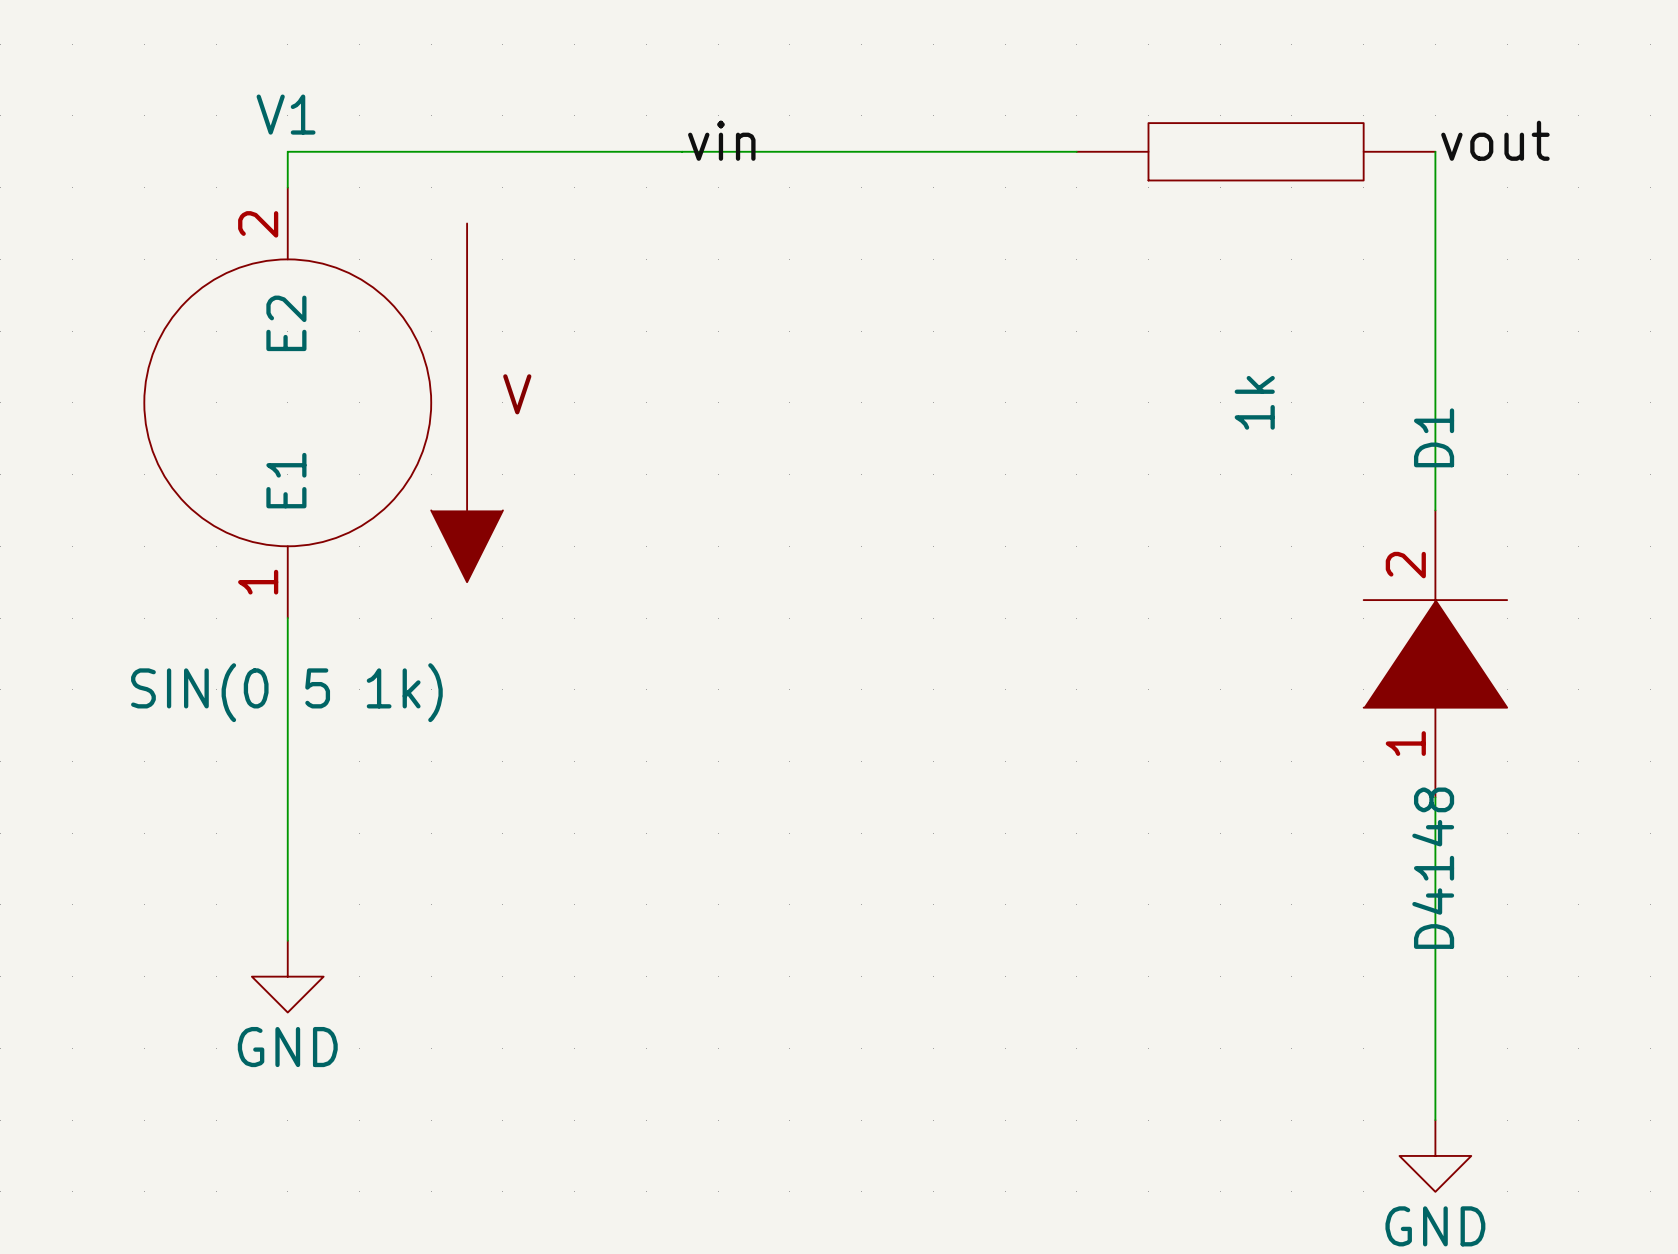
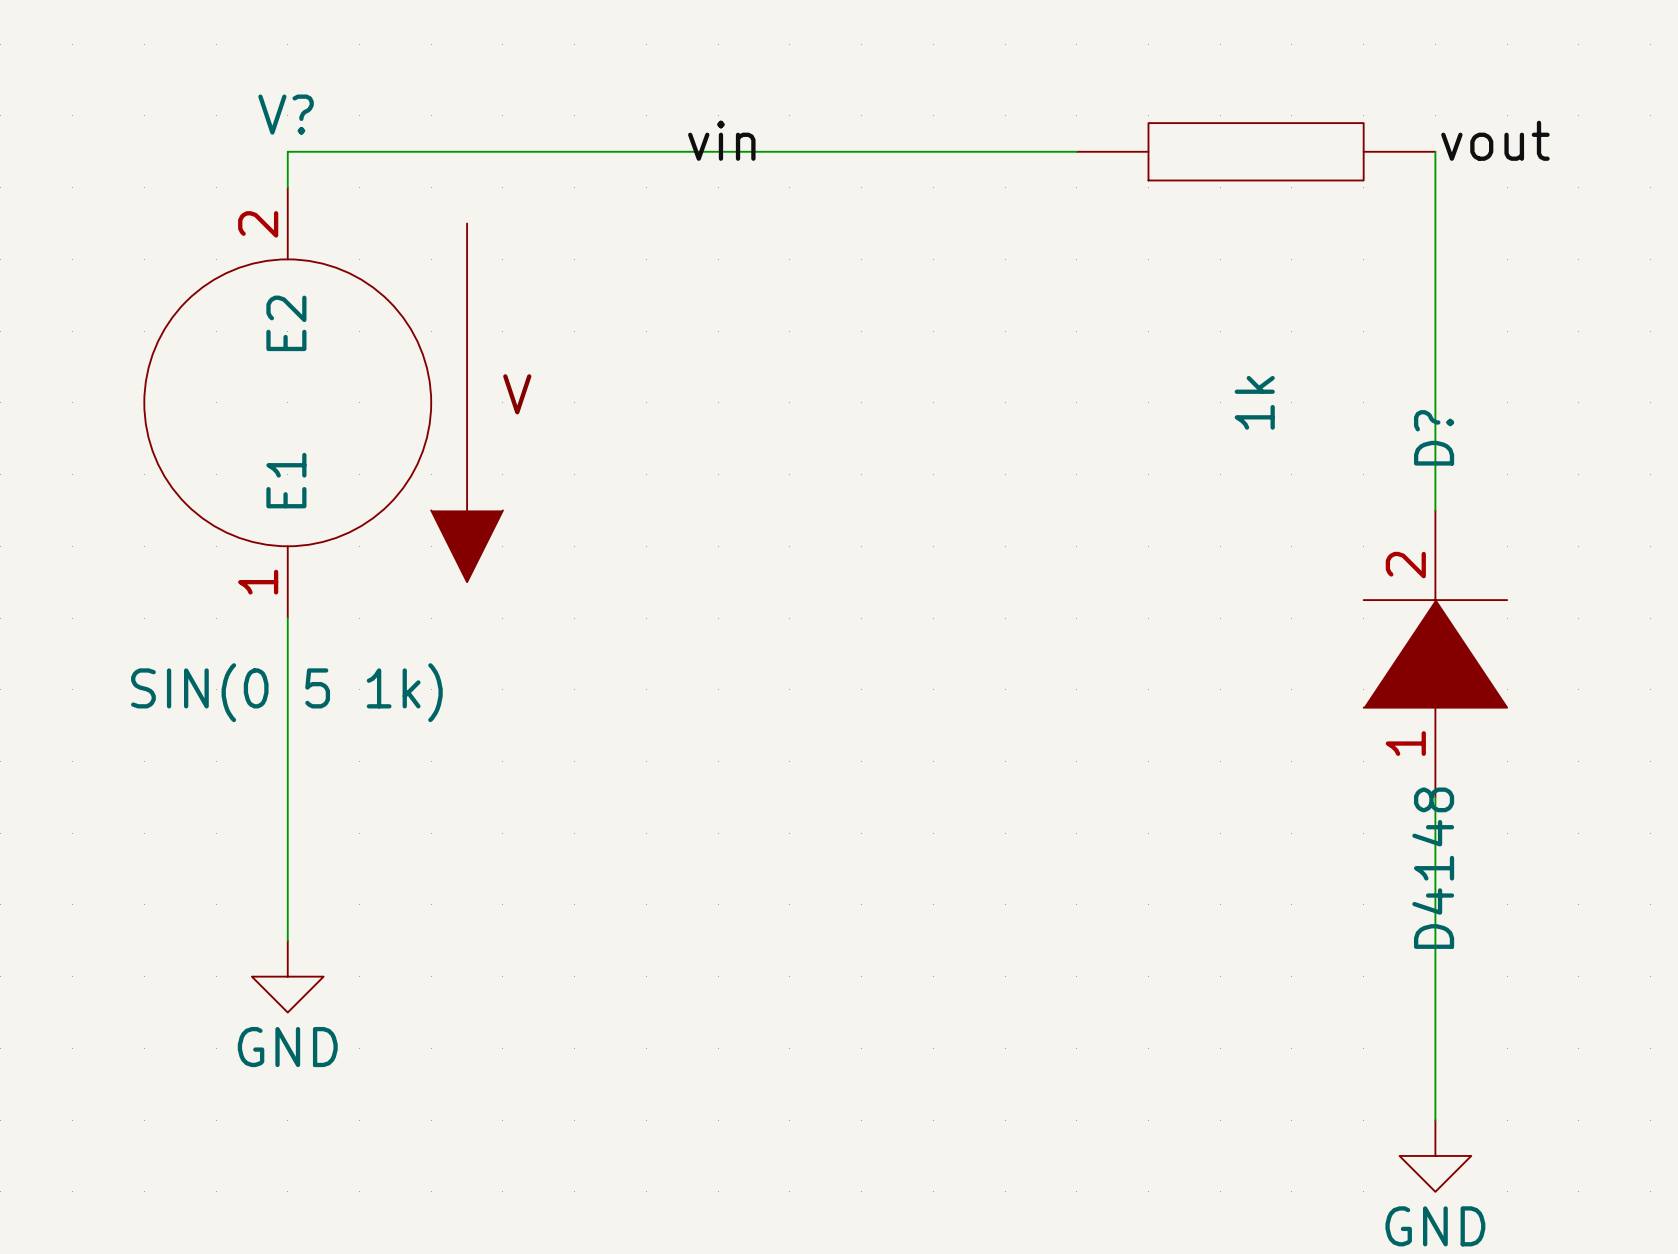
V1 name: V1 (286, 114) -> V? (286, 114)
D1 name: D1 (1434, 437) -> D? (1434, 437)

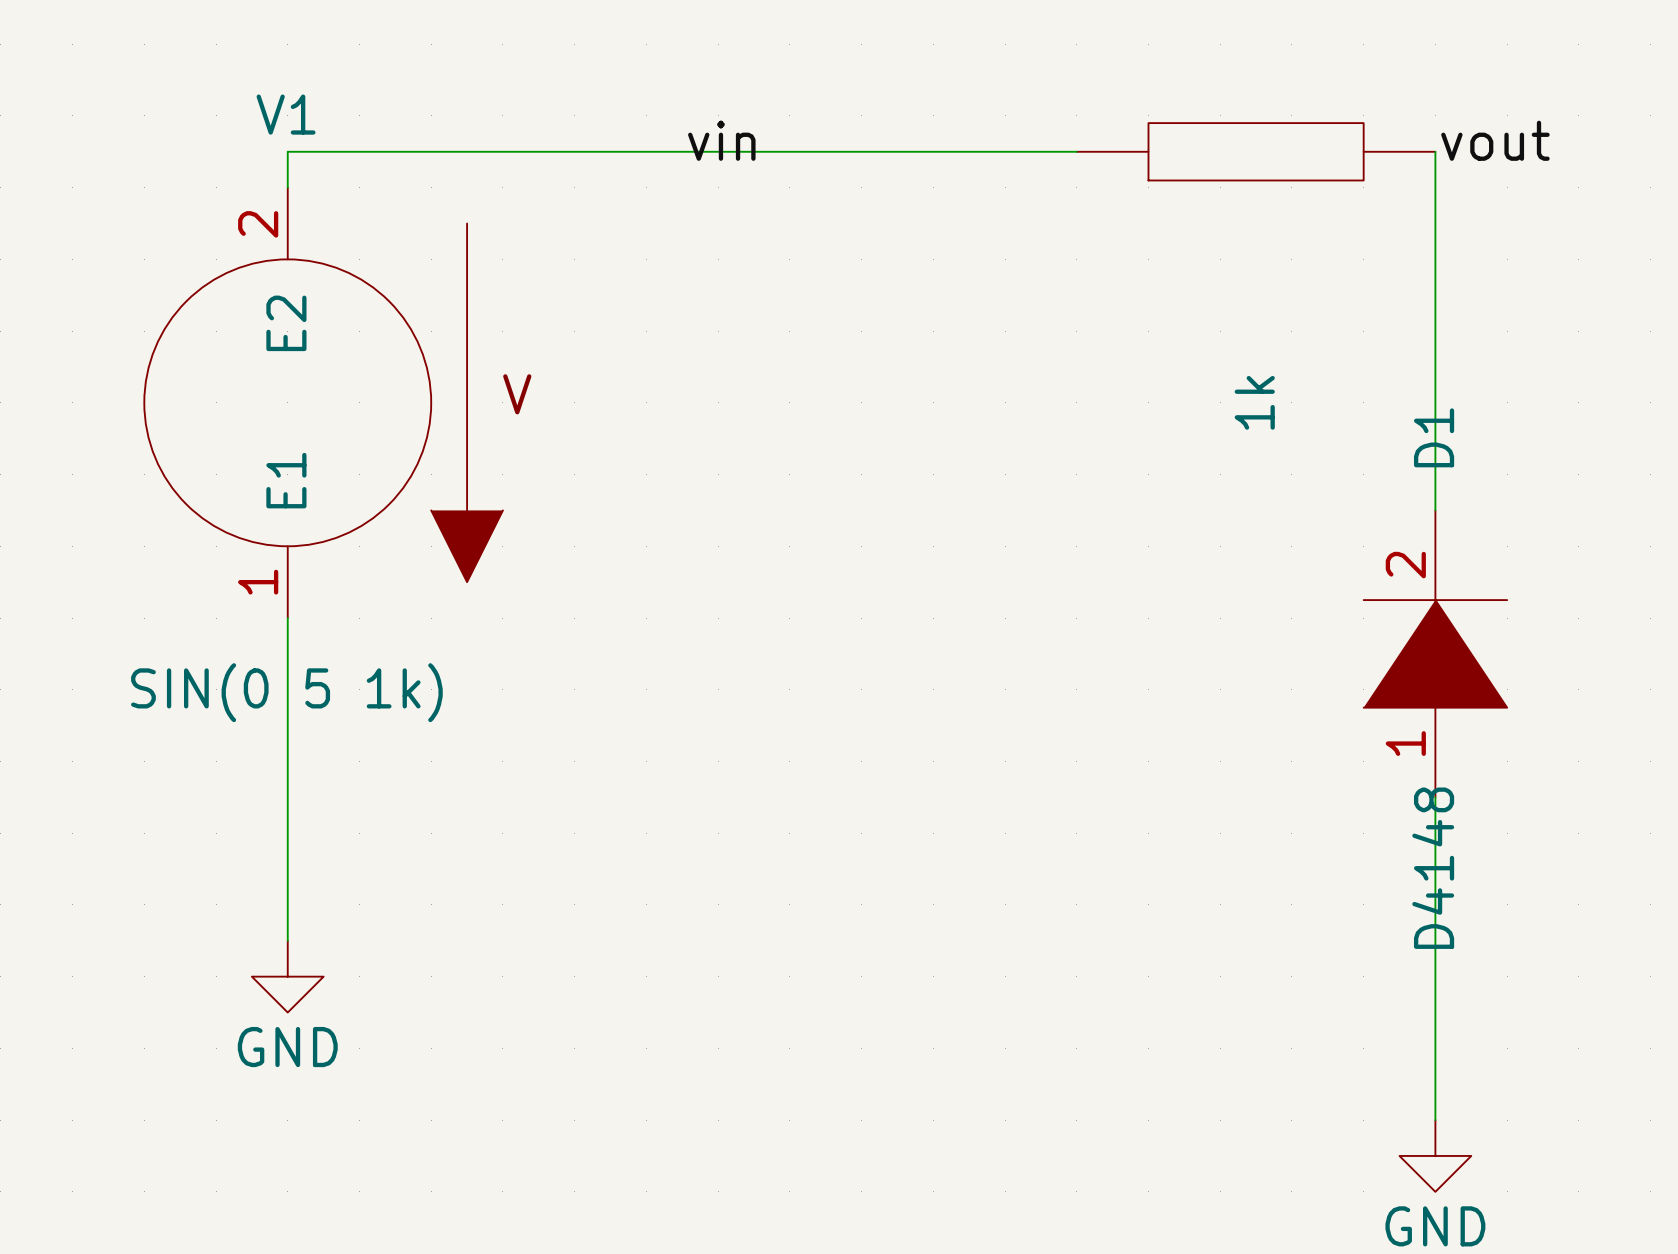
V? name: V? (286, 114) -> V1 (286, 114)
D? name: D? (1434, 437) -> D1 (1434, 437)

